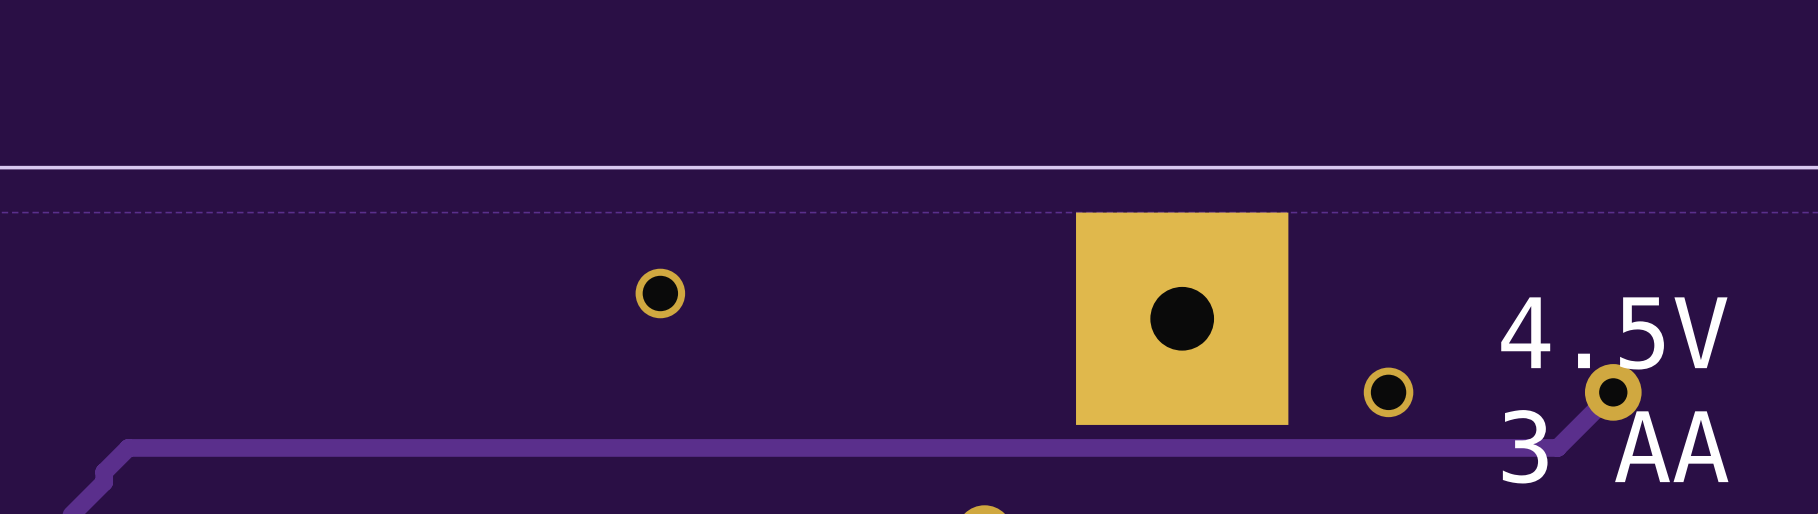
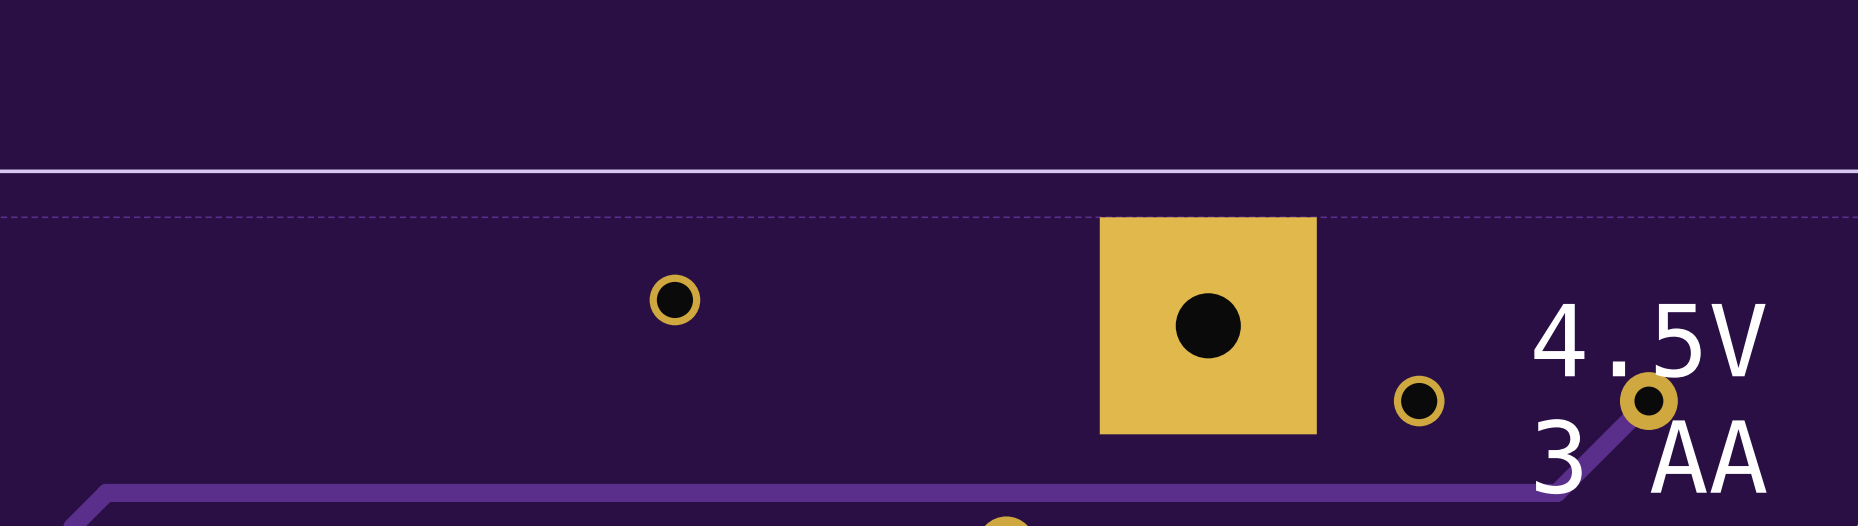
track: (1557, 447) (128, 447) (104, 472) (104, 482) -> (1592, 457) (1557, 492) (106, 492)

